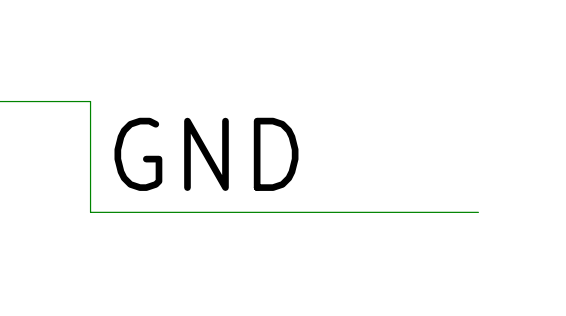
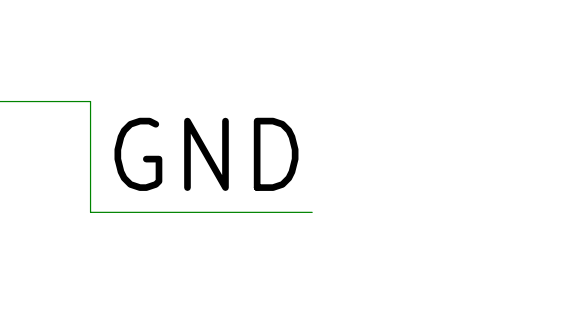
wire: (312, 212) (478, 212) -> none

